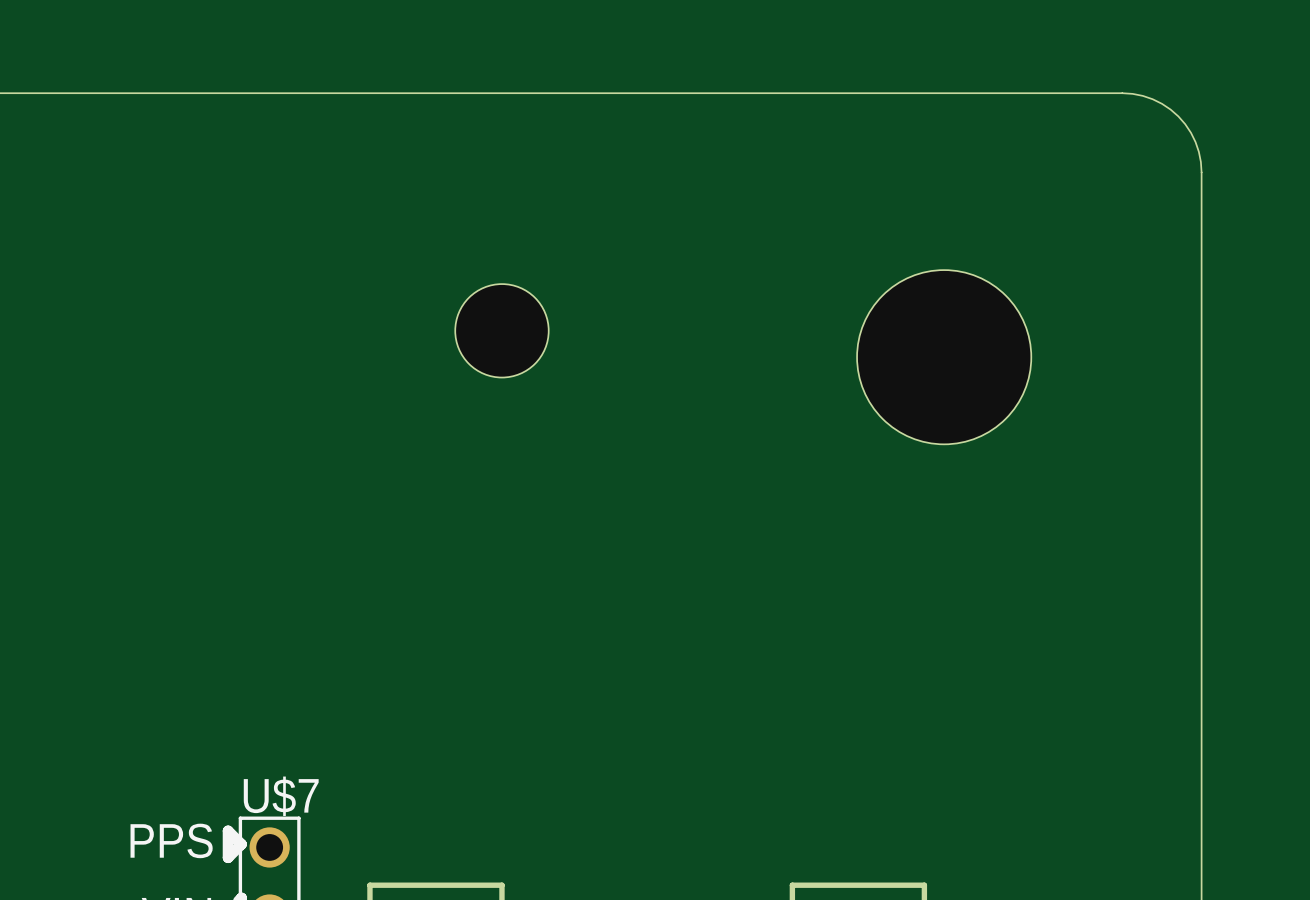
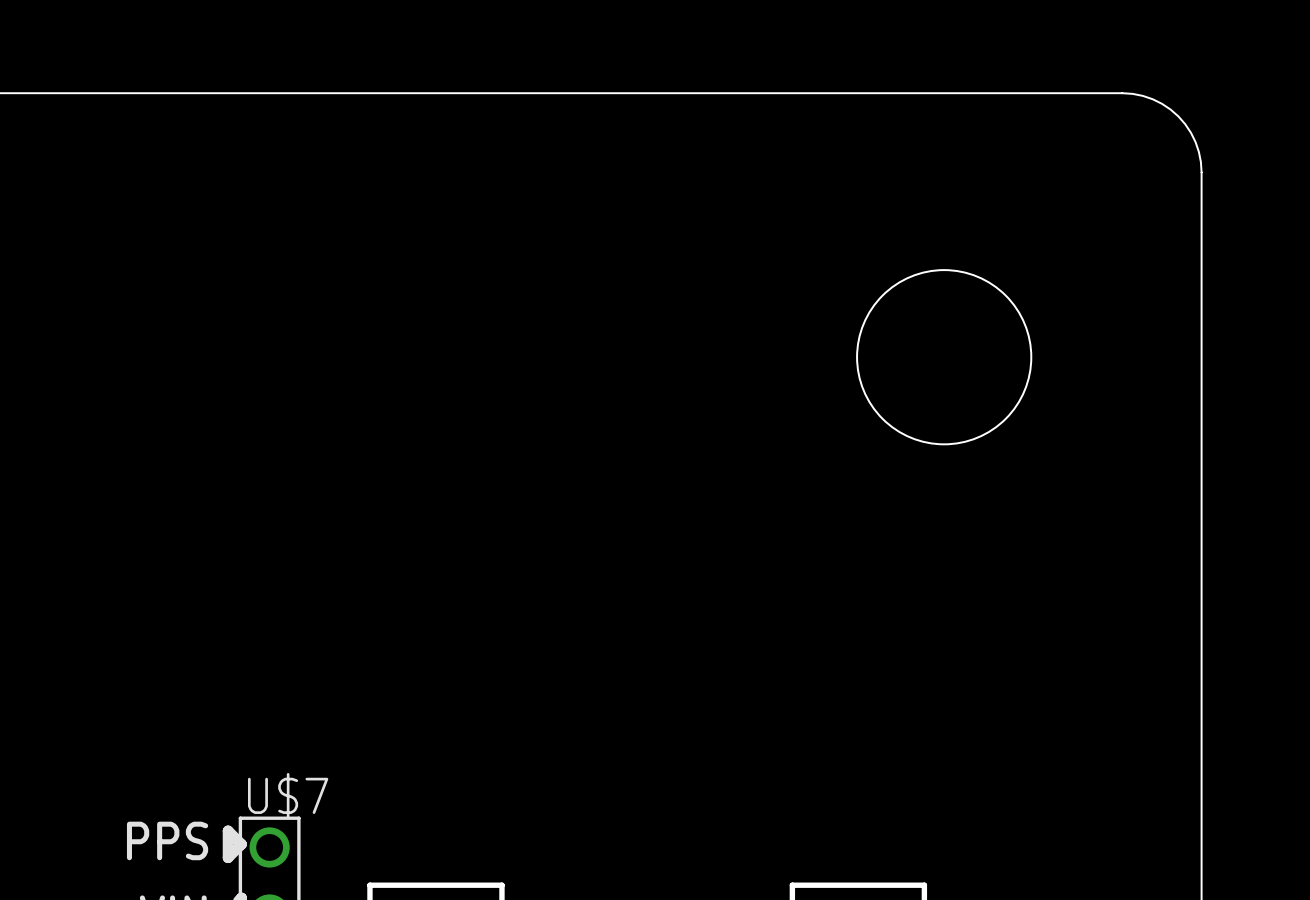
hole: (501, 330) -> none

